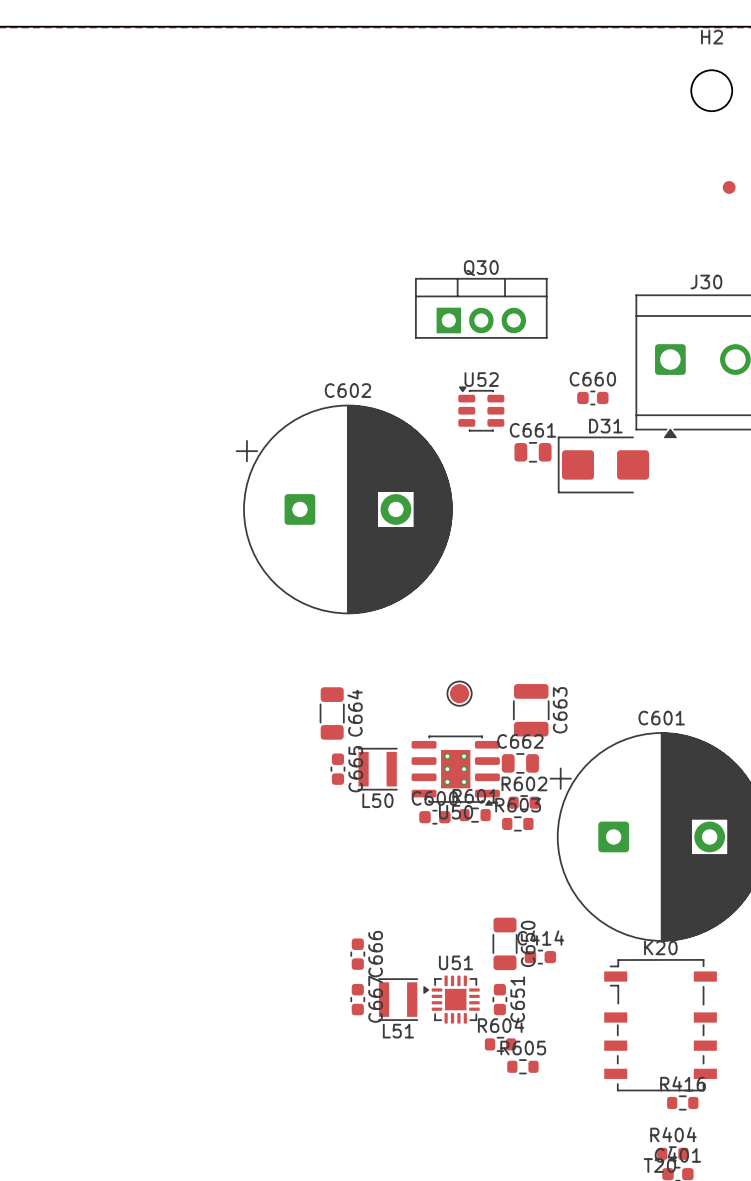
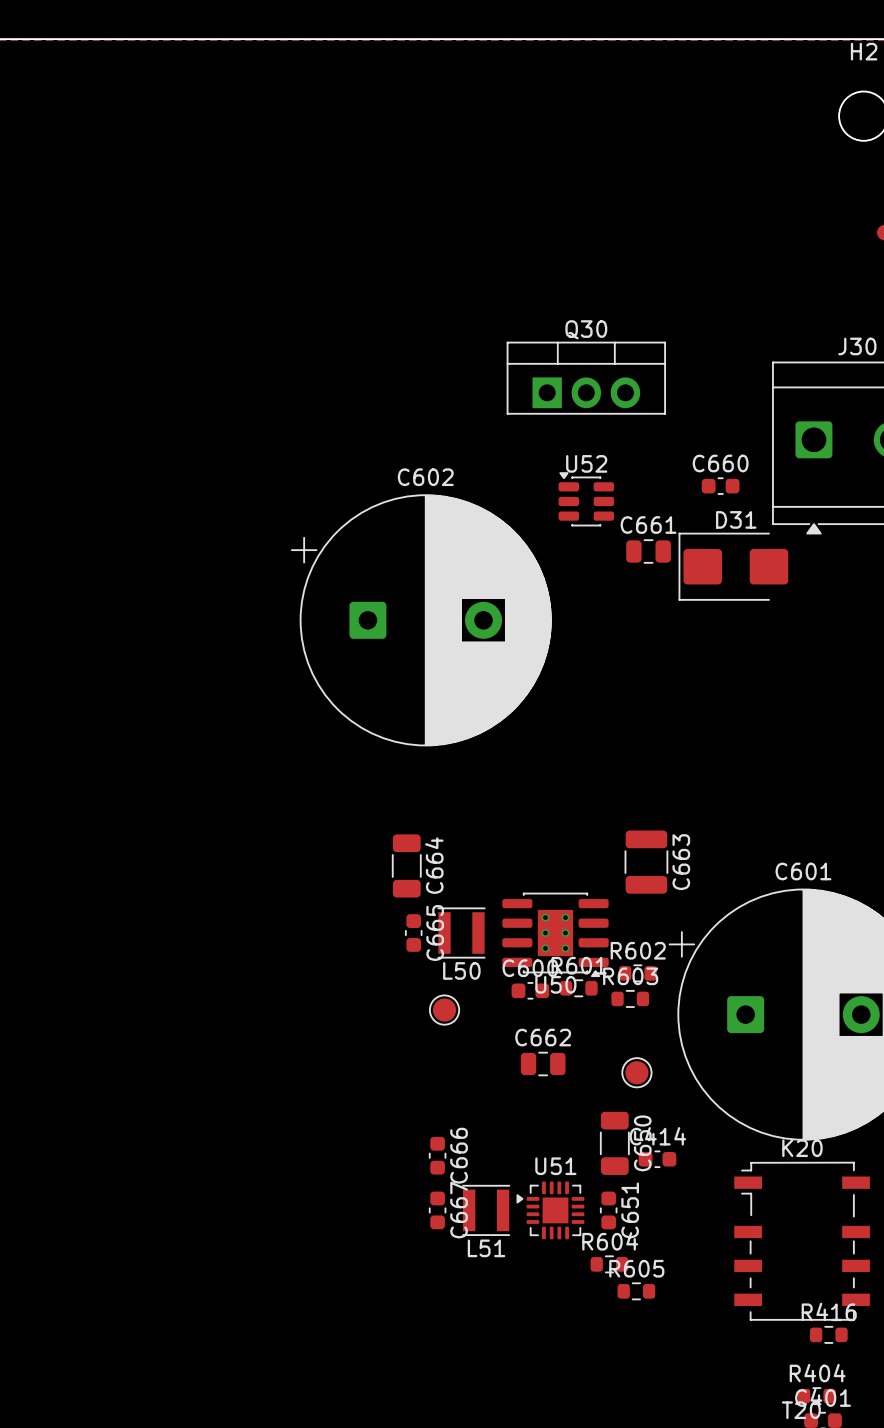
part: (459, 693) -> none
C662 position: (520, 763) -> (543, 1064)
part: none -> (444, 1010)
part: none -> (636, 1072)

